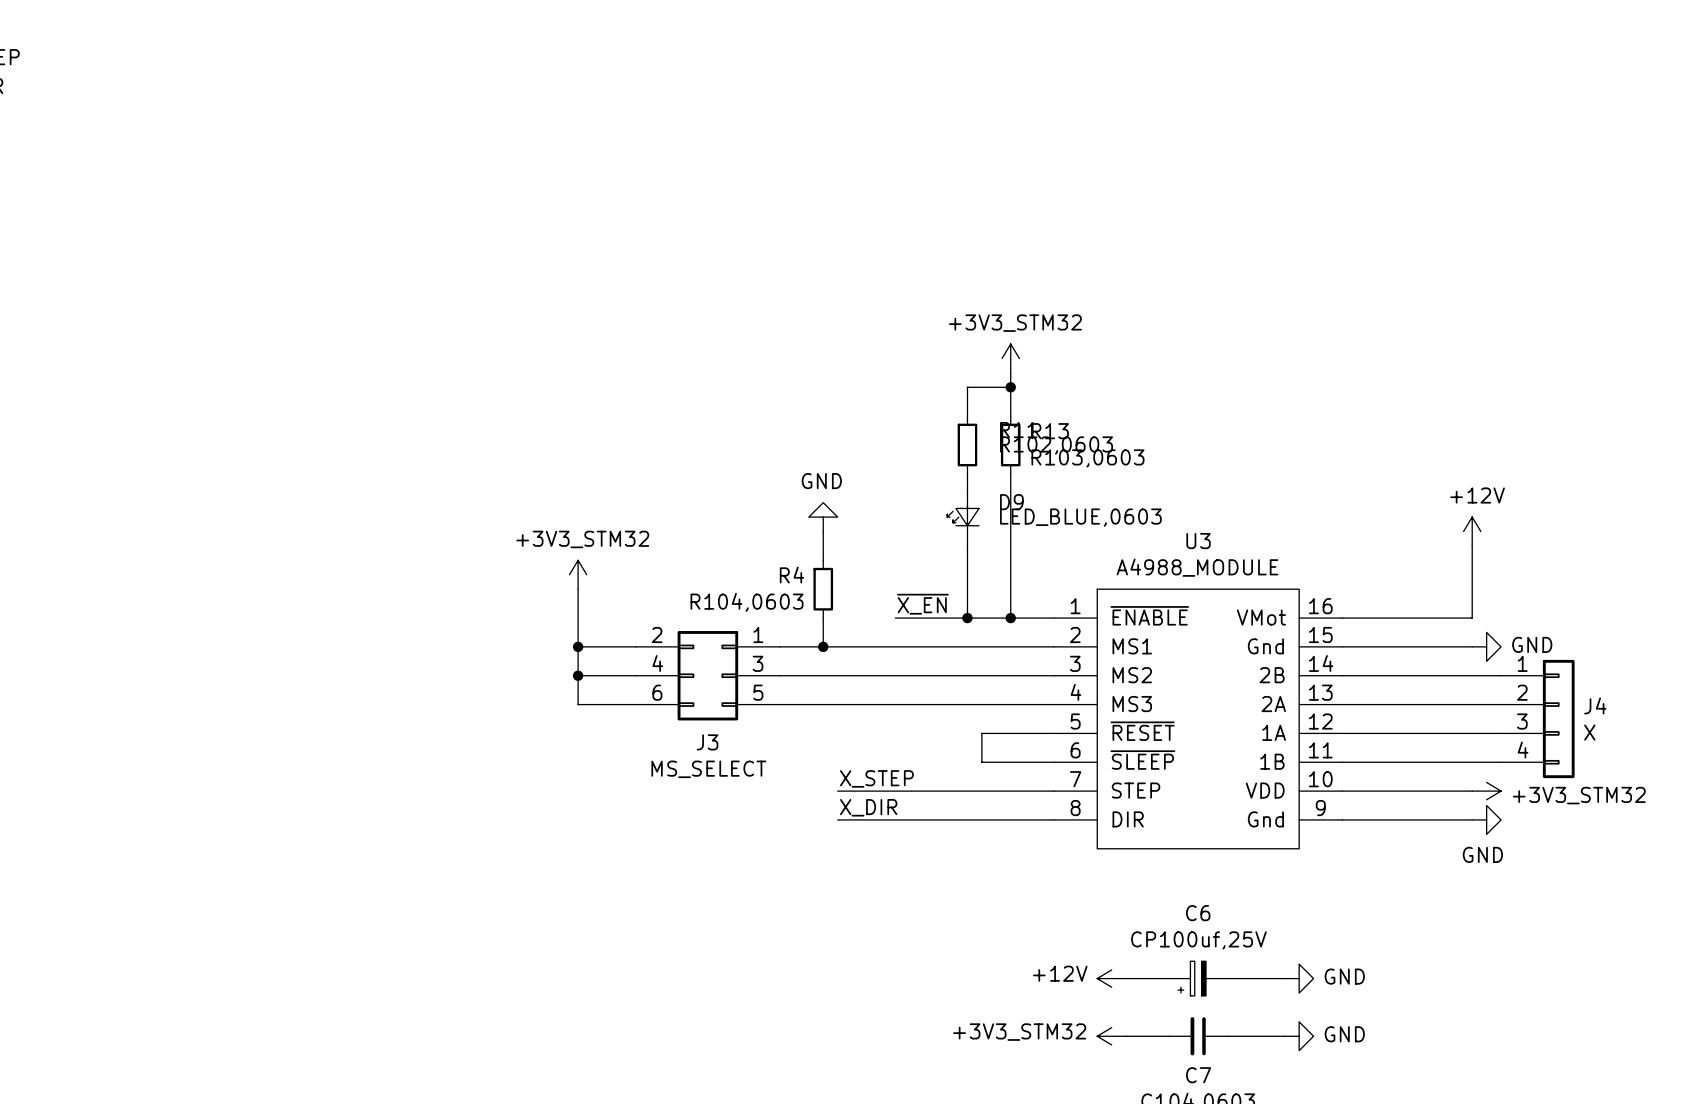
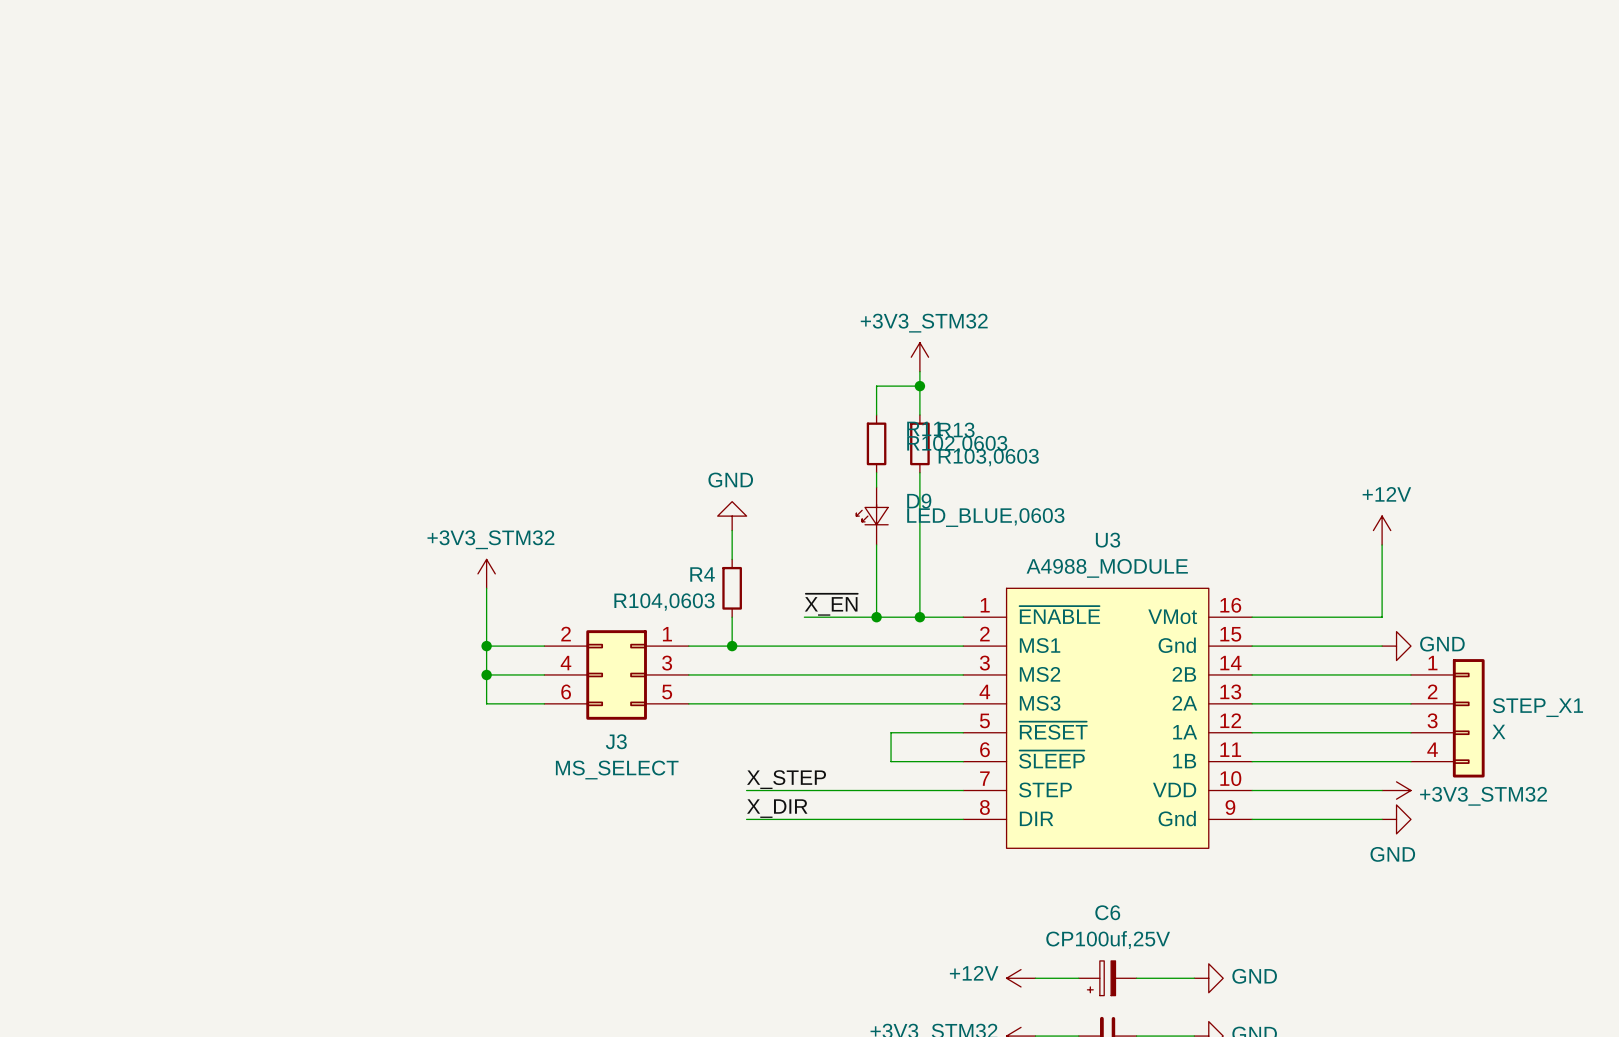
J4 name: J4 (1595, 706) -> STEP_X1 (1537, 707)

